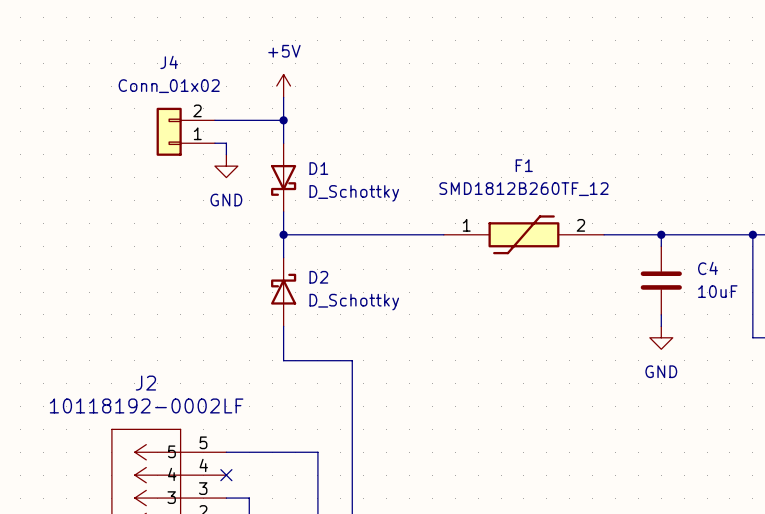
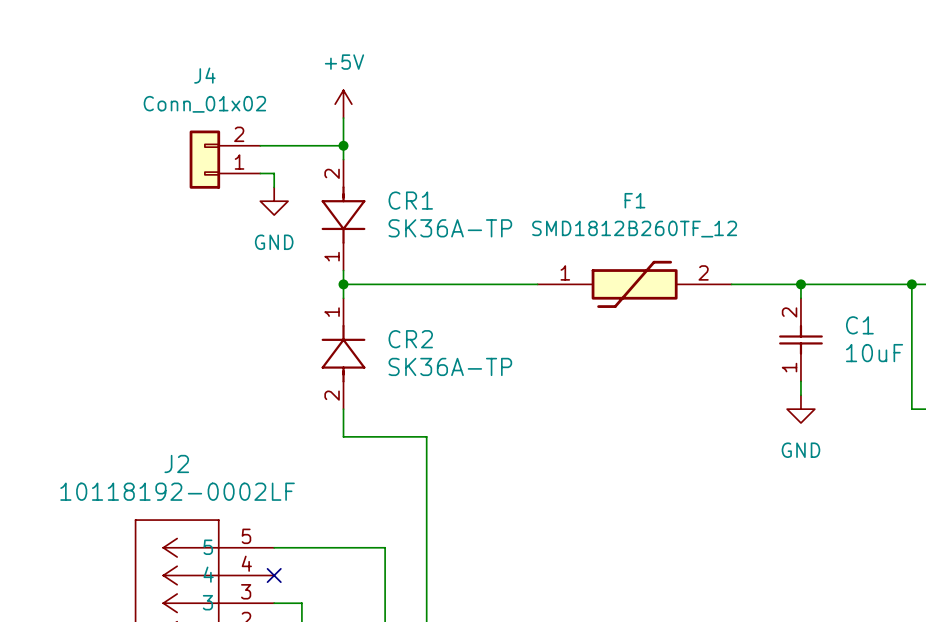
D1: D_Schottky (283, 177) -> none
CR1: none -> SK36A-TP (343, 215)
C4: 10uF (661, 280) -> none
C1: none -> 10uF (800, 339)
D2: D_Schottky (283, 292) -> none
CR2: none -> SK36A-TP (343, 353)

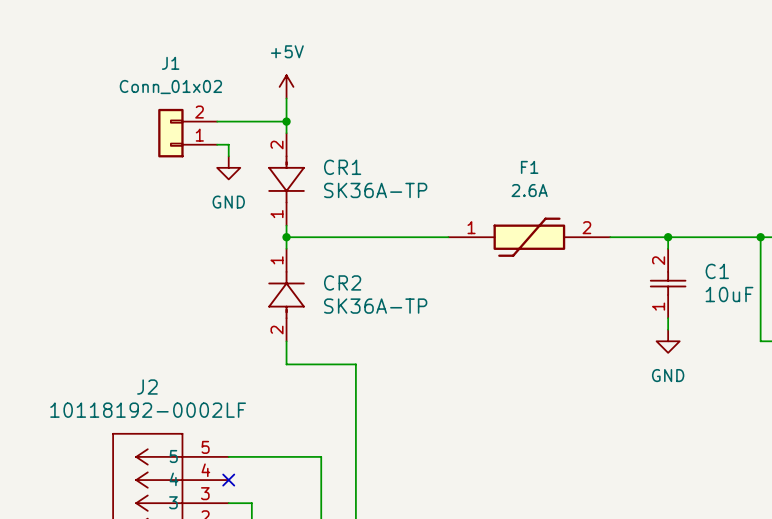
J4 name: J4 (204, 75) -> J1 (170, 63)
F1 value: SMD1812B260TF_12 (634, 229) -> 2.6A (529, 190)

